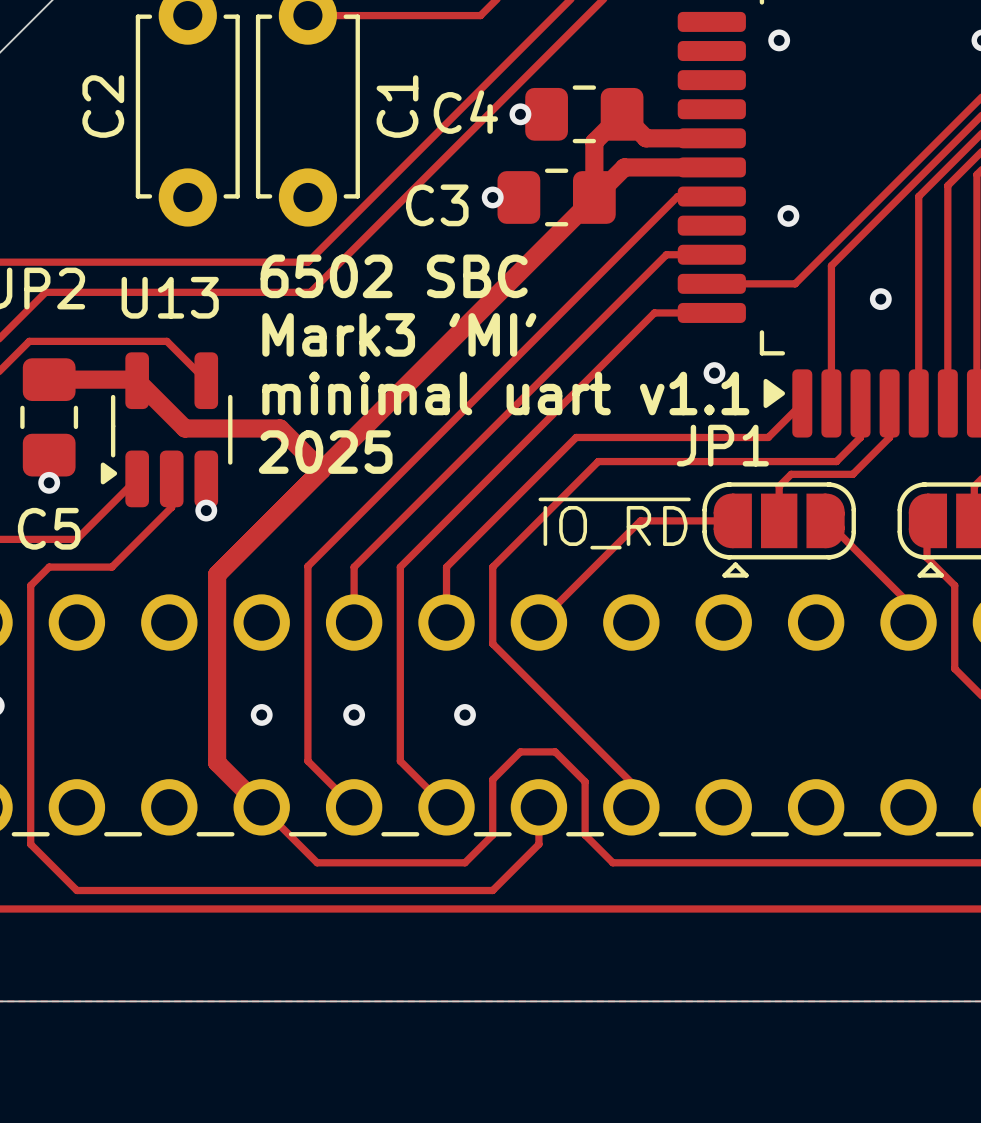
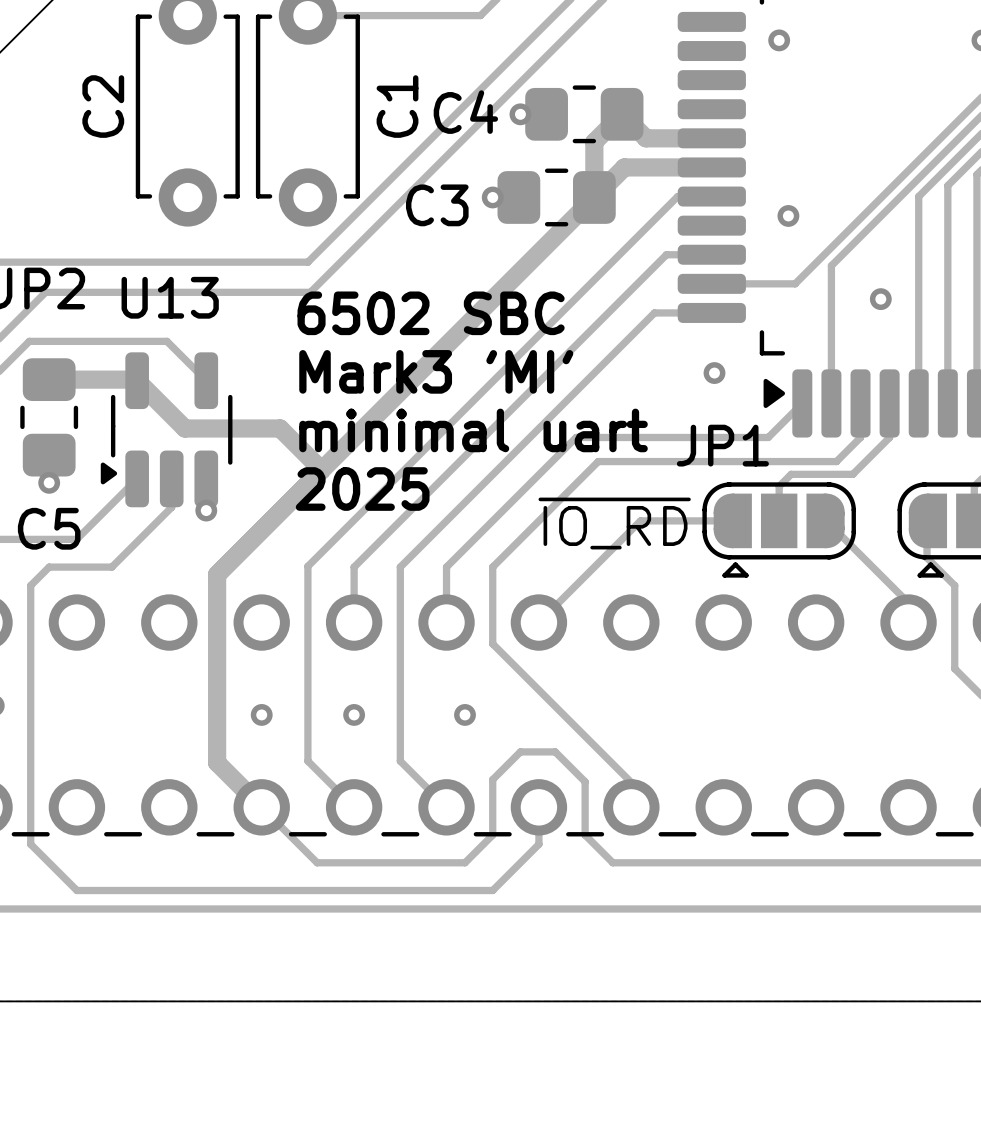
text position: 6502 SBC (394, 276) -> 6502 SBC (431, 313)
text position: Mark3 'MI' (399, 334) -> Mark3 'MI' (436, 371)
text: minimal uart v1.1 (505, 393) -> minimal uart (473, 430)
text position: 2025 (325, 452) -> 2025 (362, 489)

